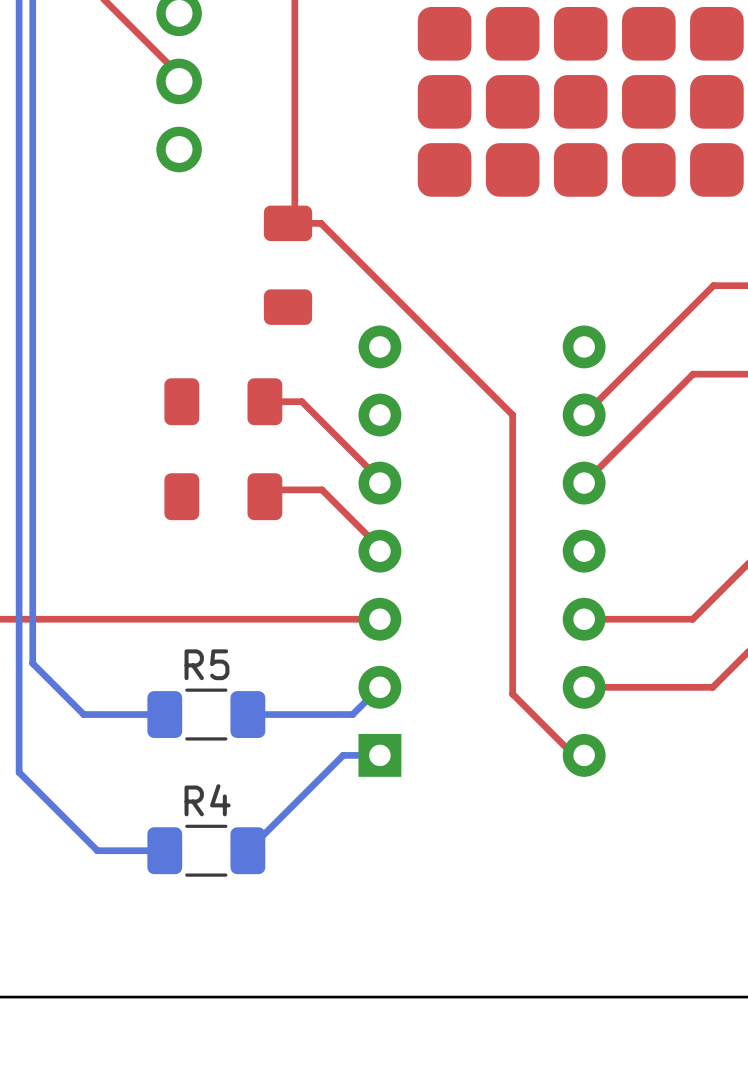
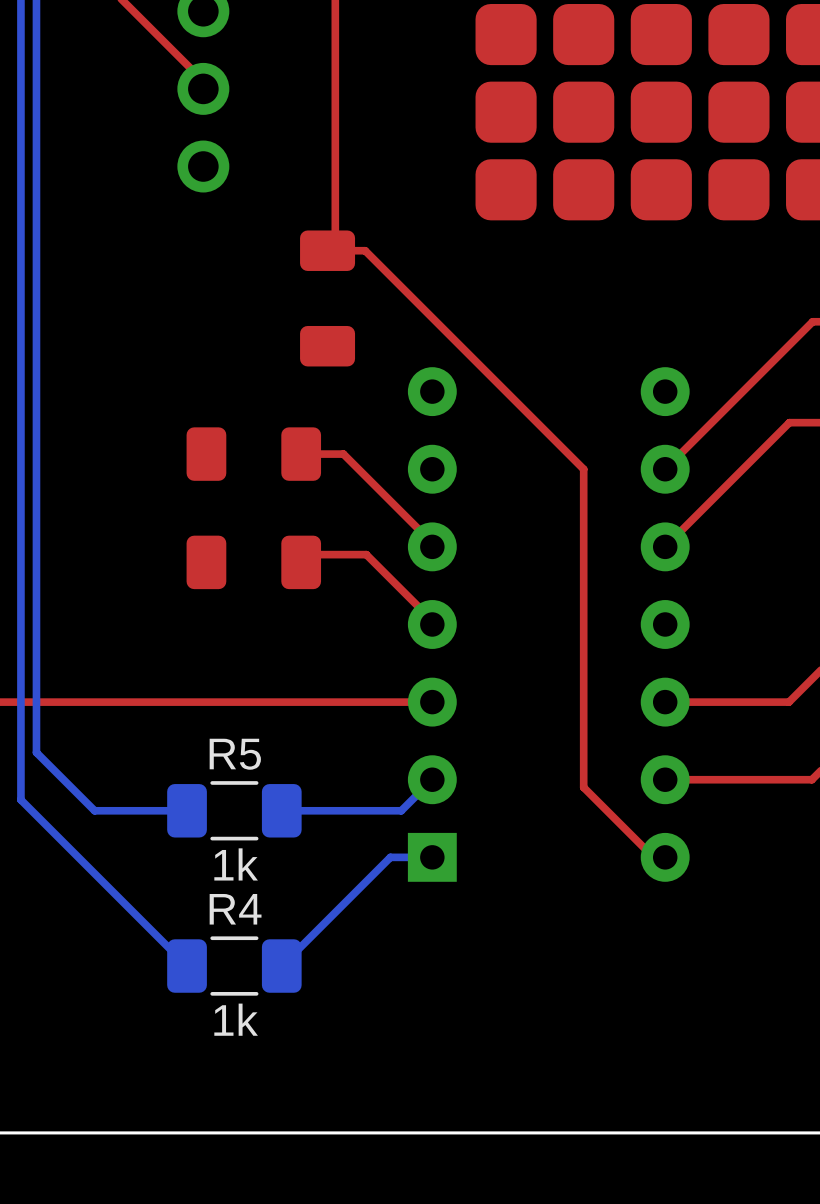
bottom track: (19, 705) (19, 772) (97, 850) (164, 850) -> (20, 799) (187, 966)
R5 value: none -> 1k (236, 864)
R4 value: none -> 1k (236, 1019)

